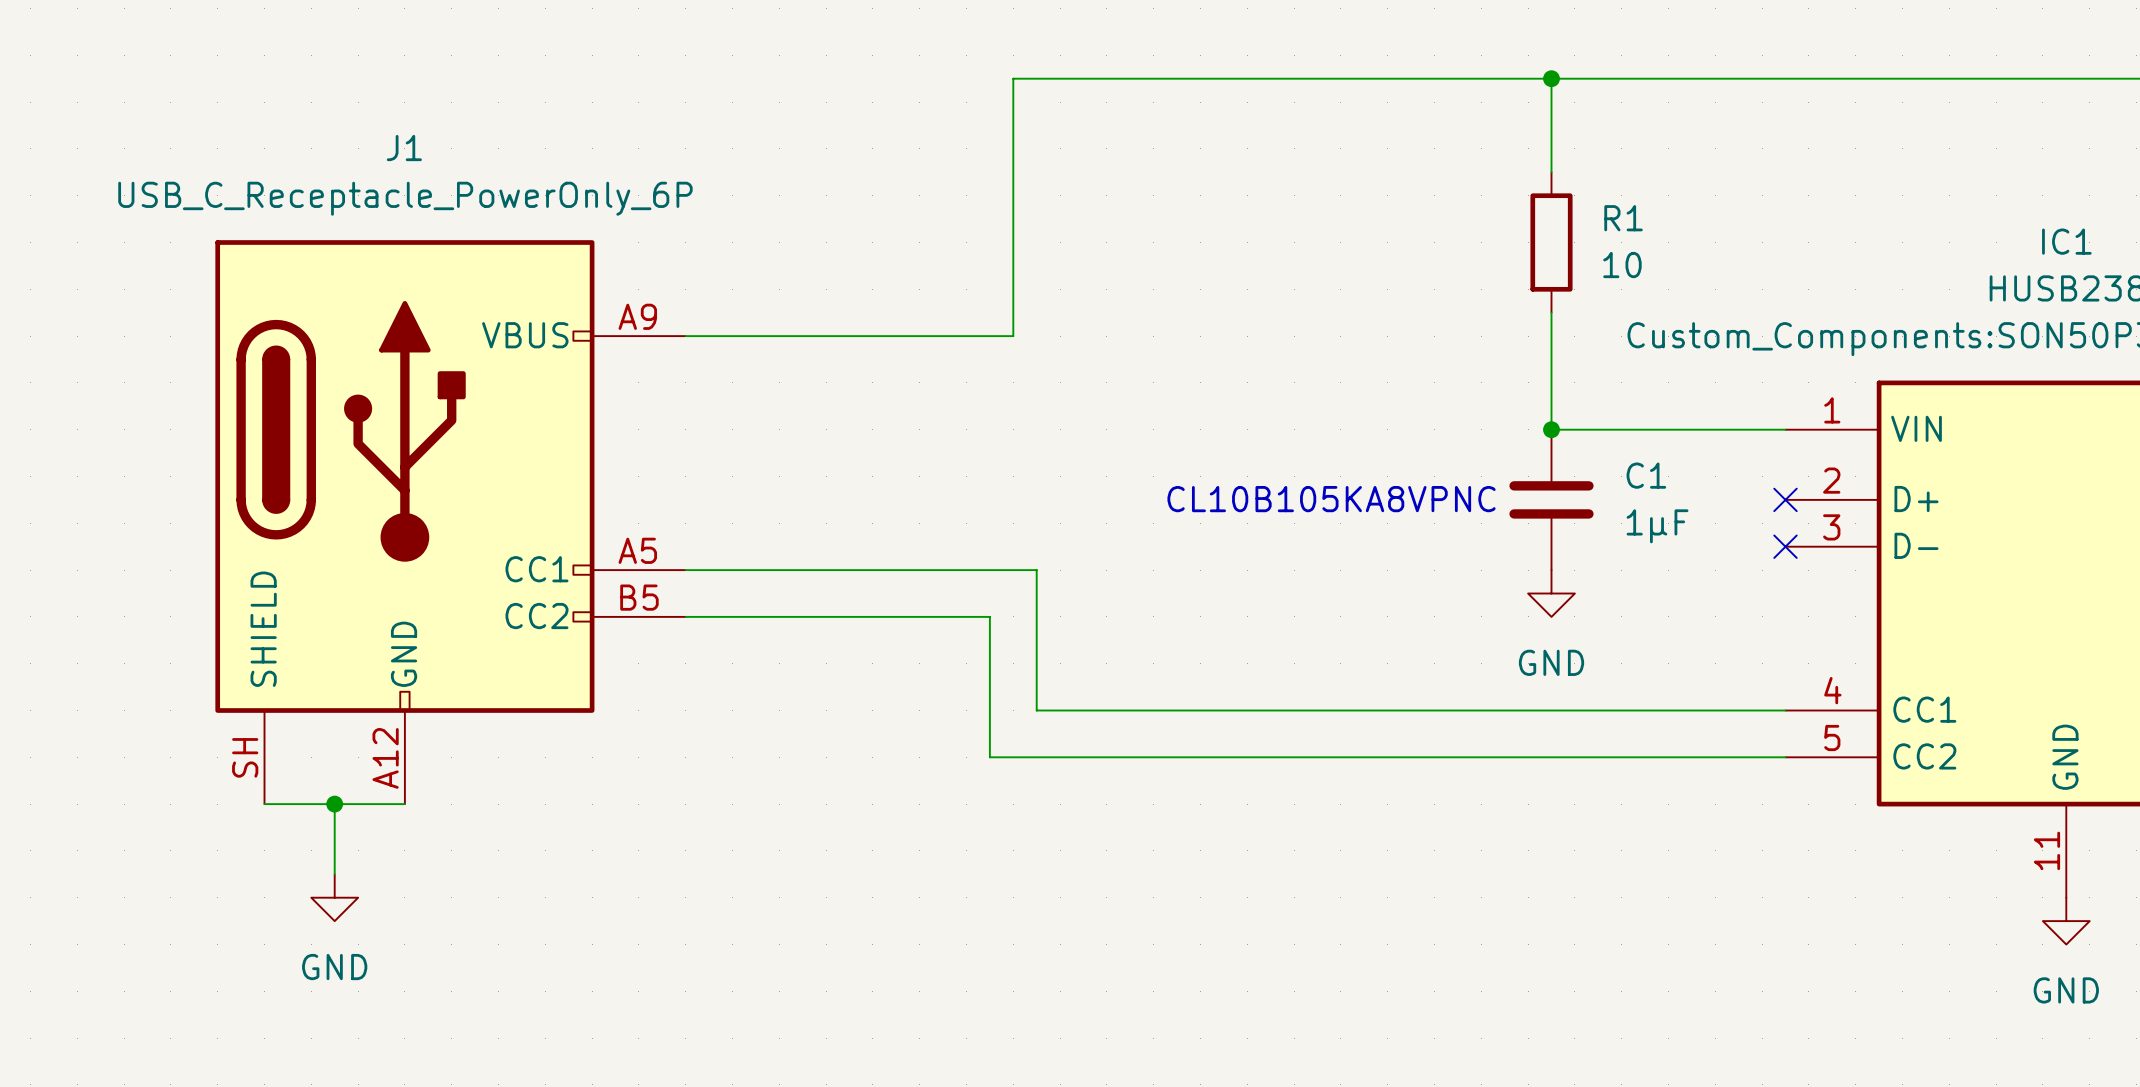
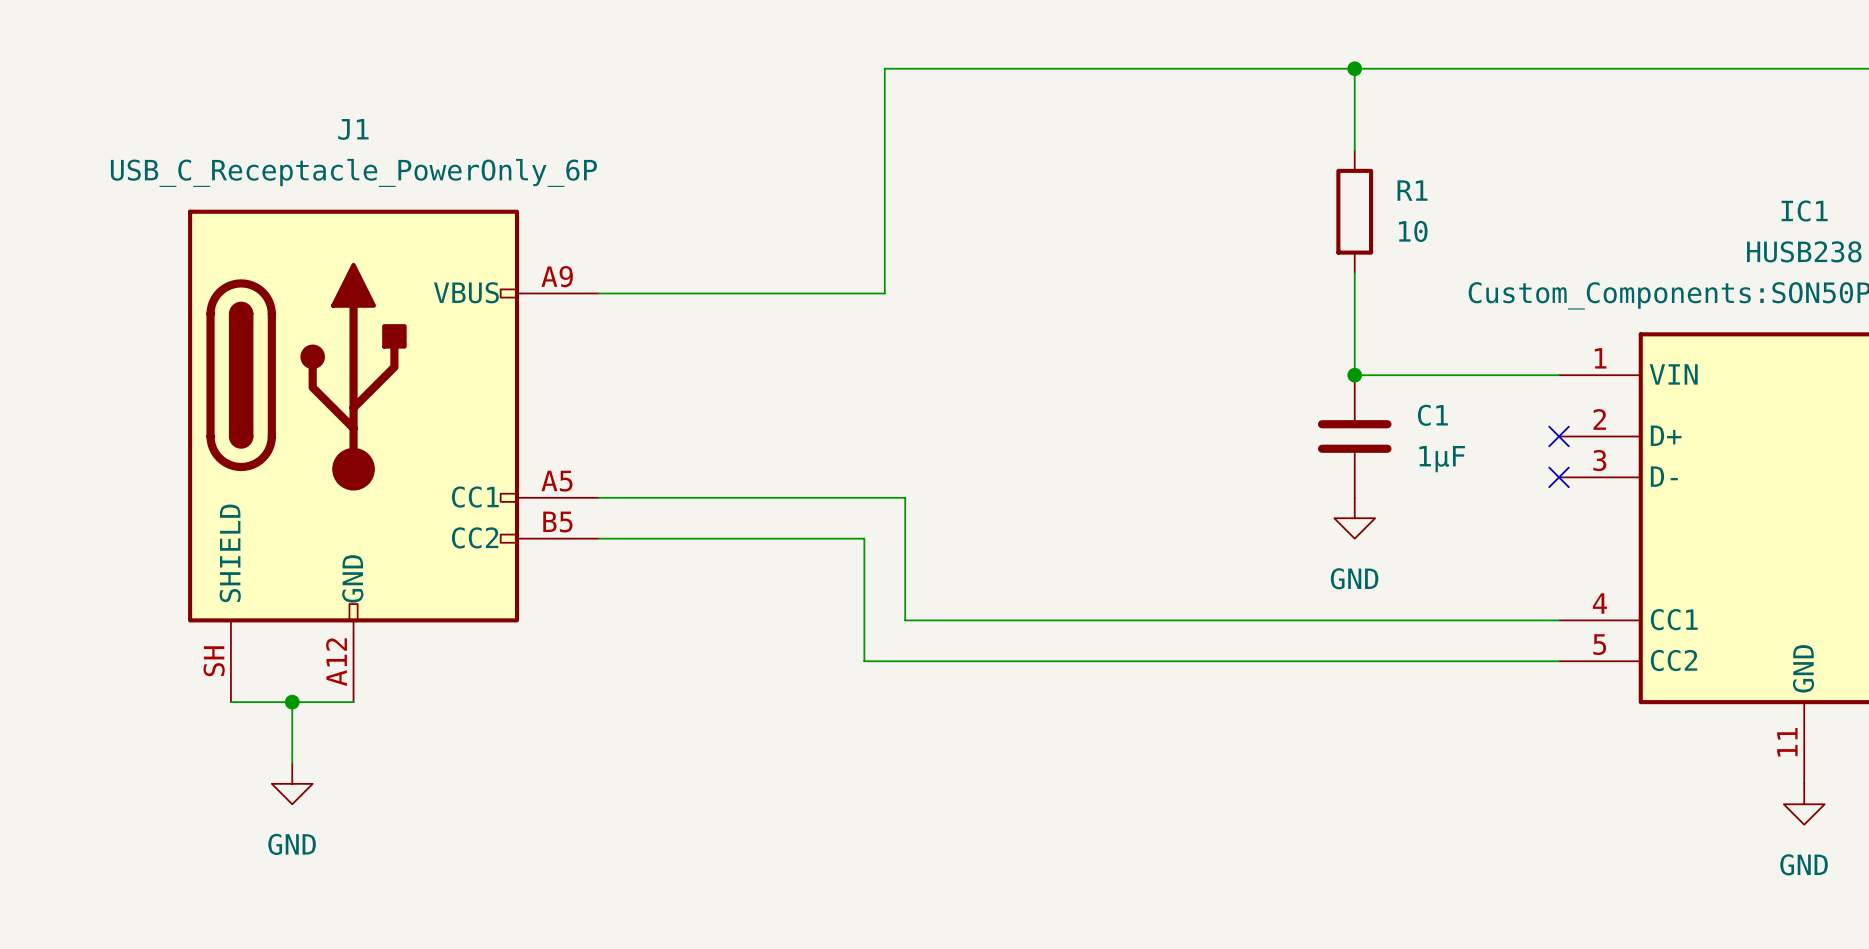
text: CL10B105KA8VPNC (1331, 499) -> none

